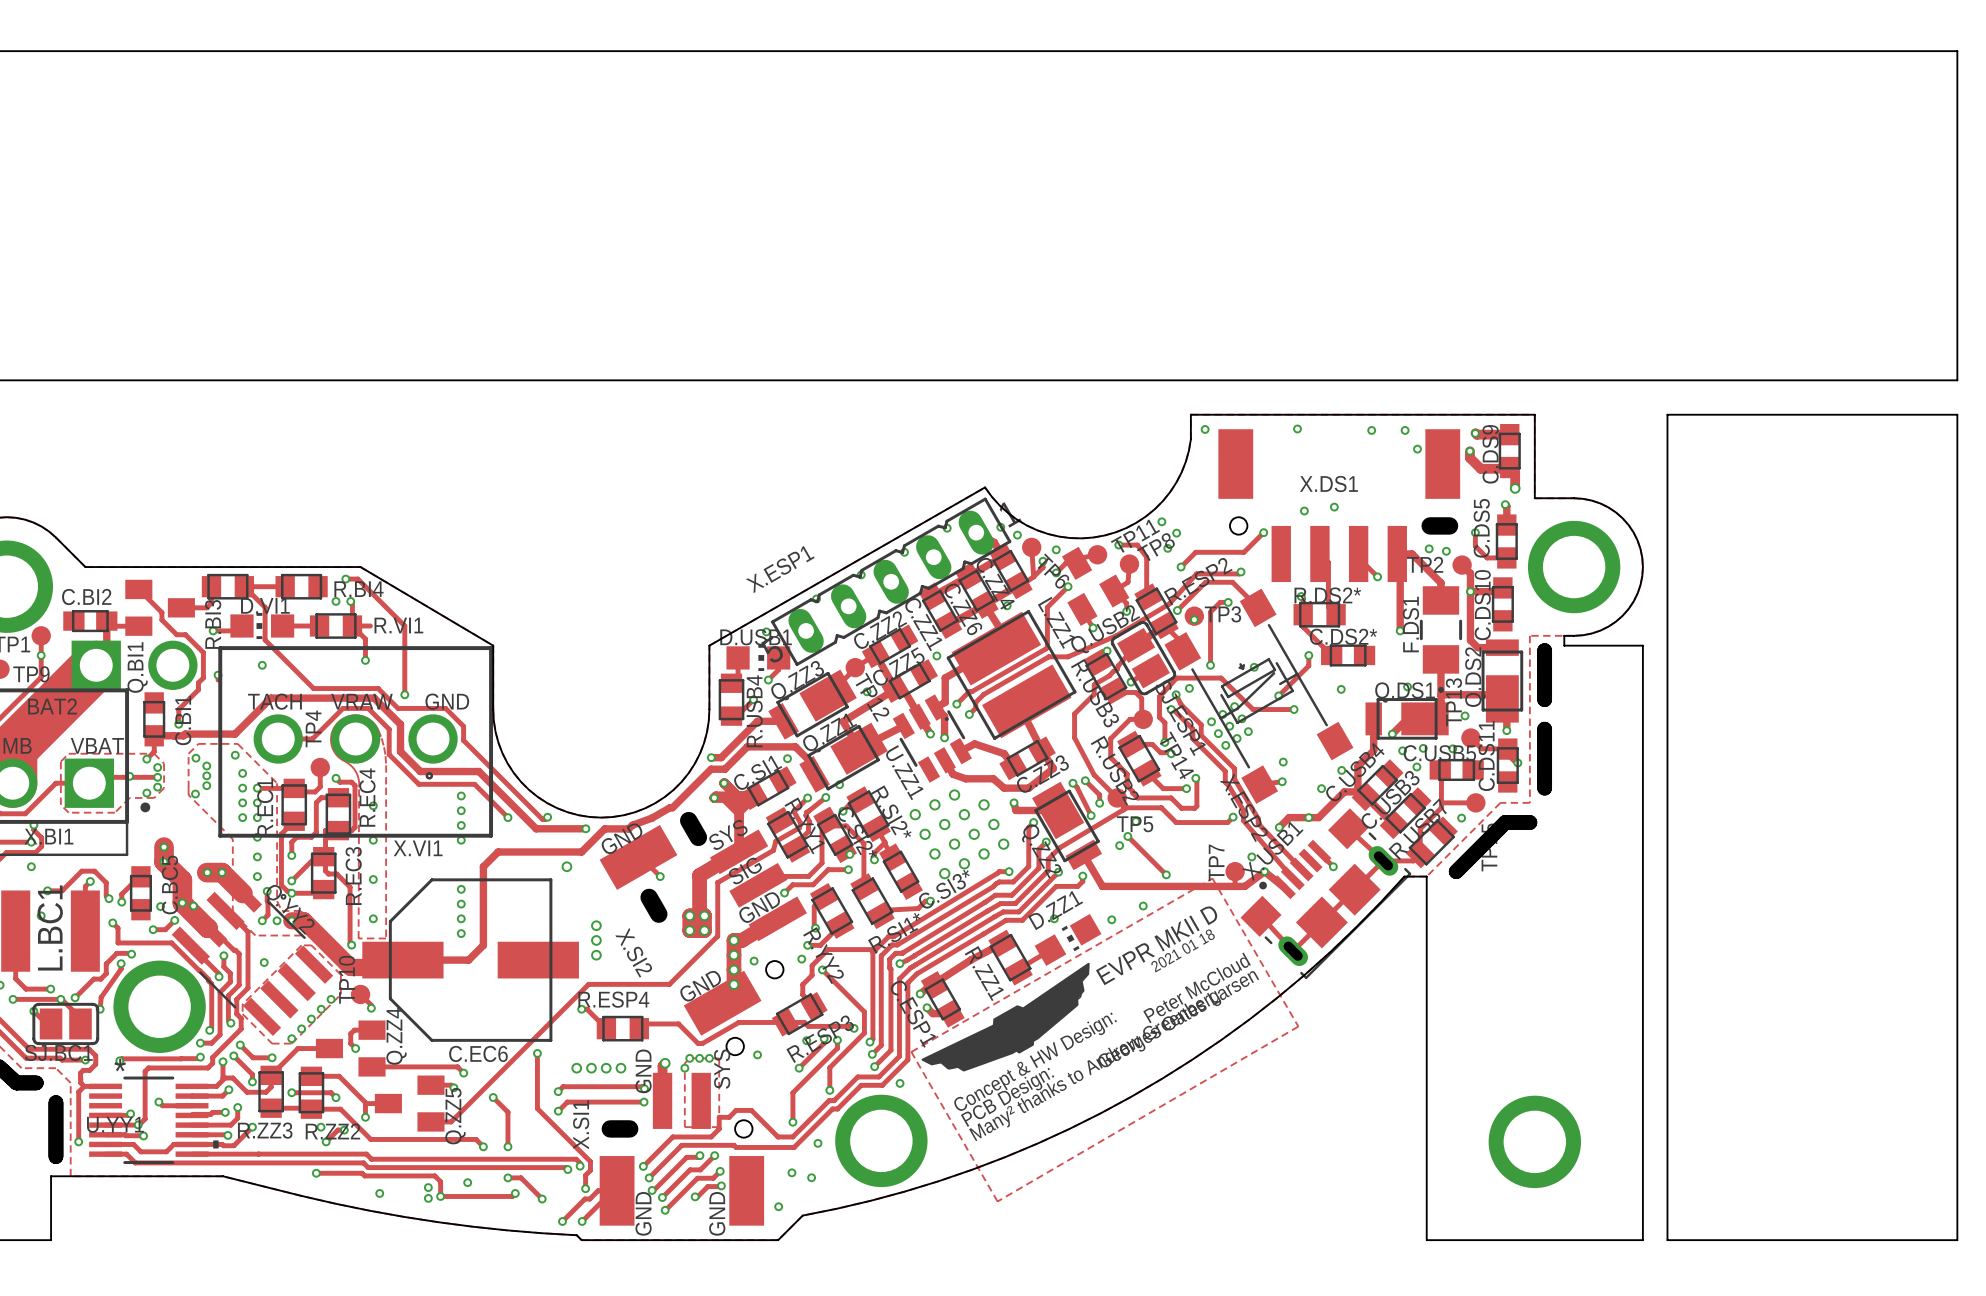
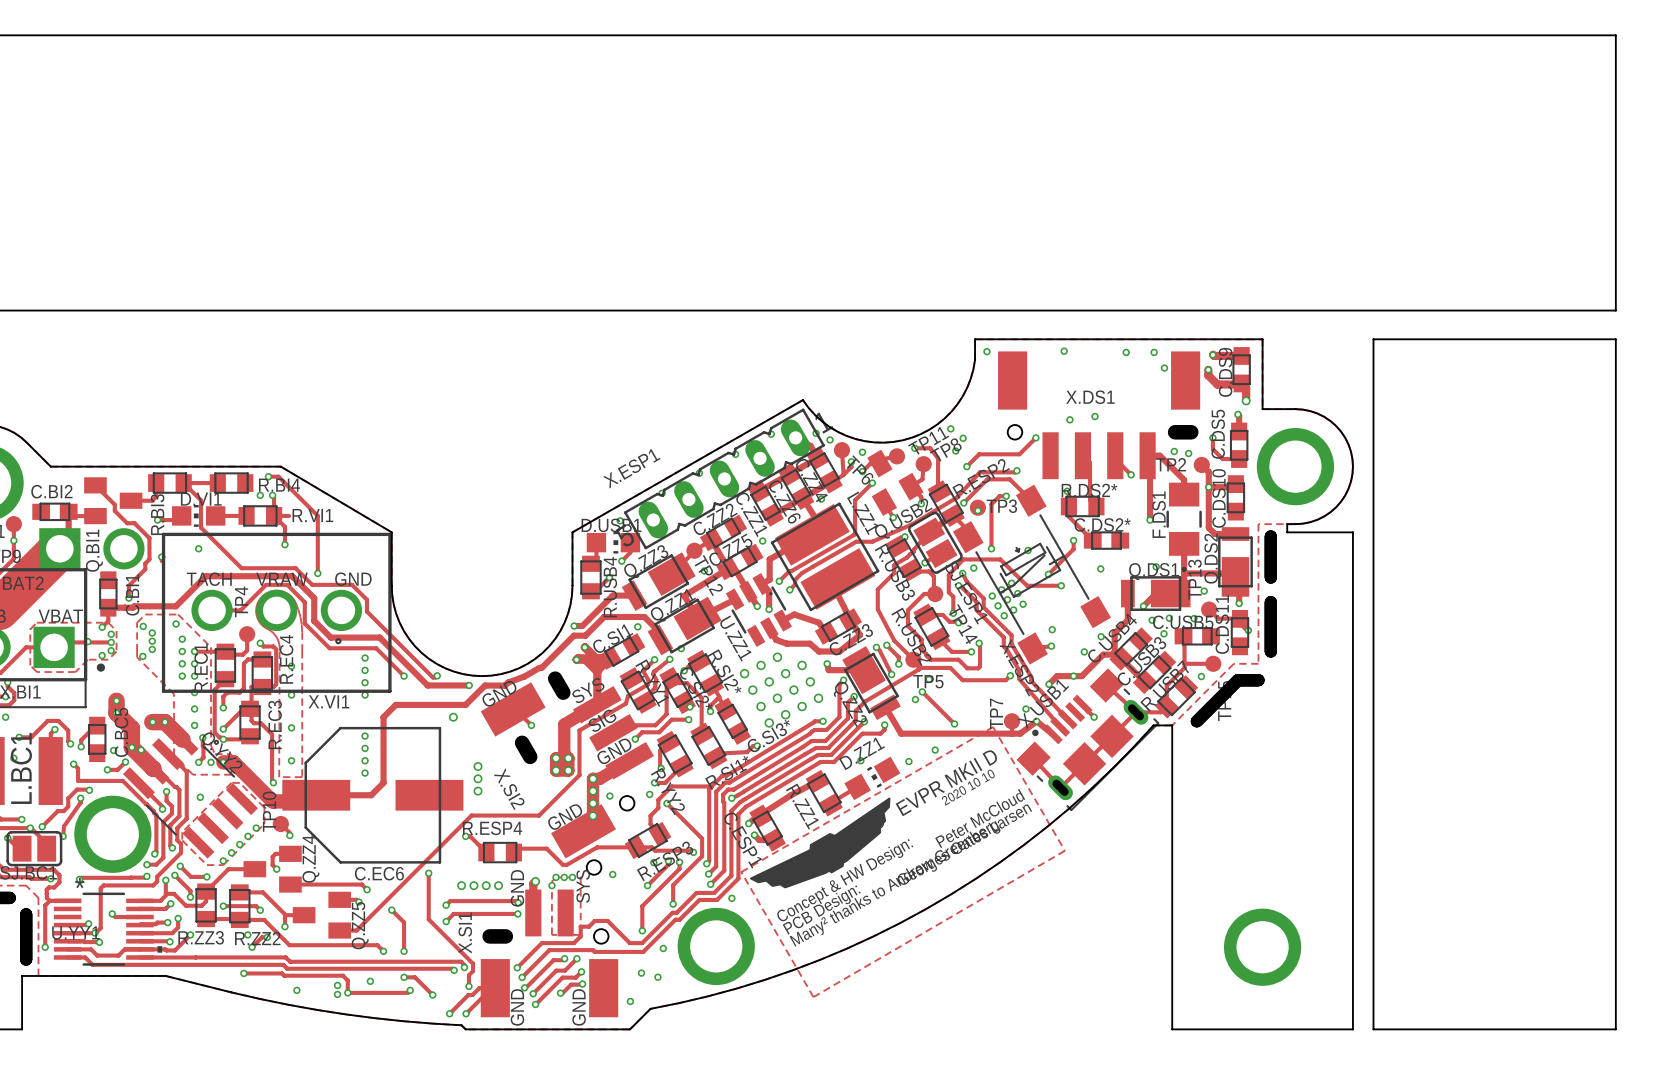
text: 2021 01 18 (1183, 950) -> 2020 10 10 (968, 787)

